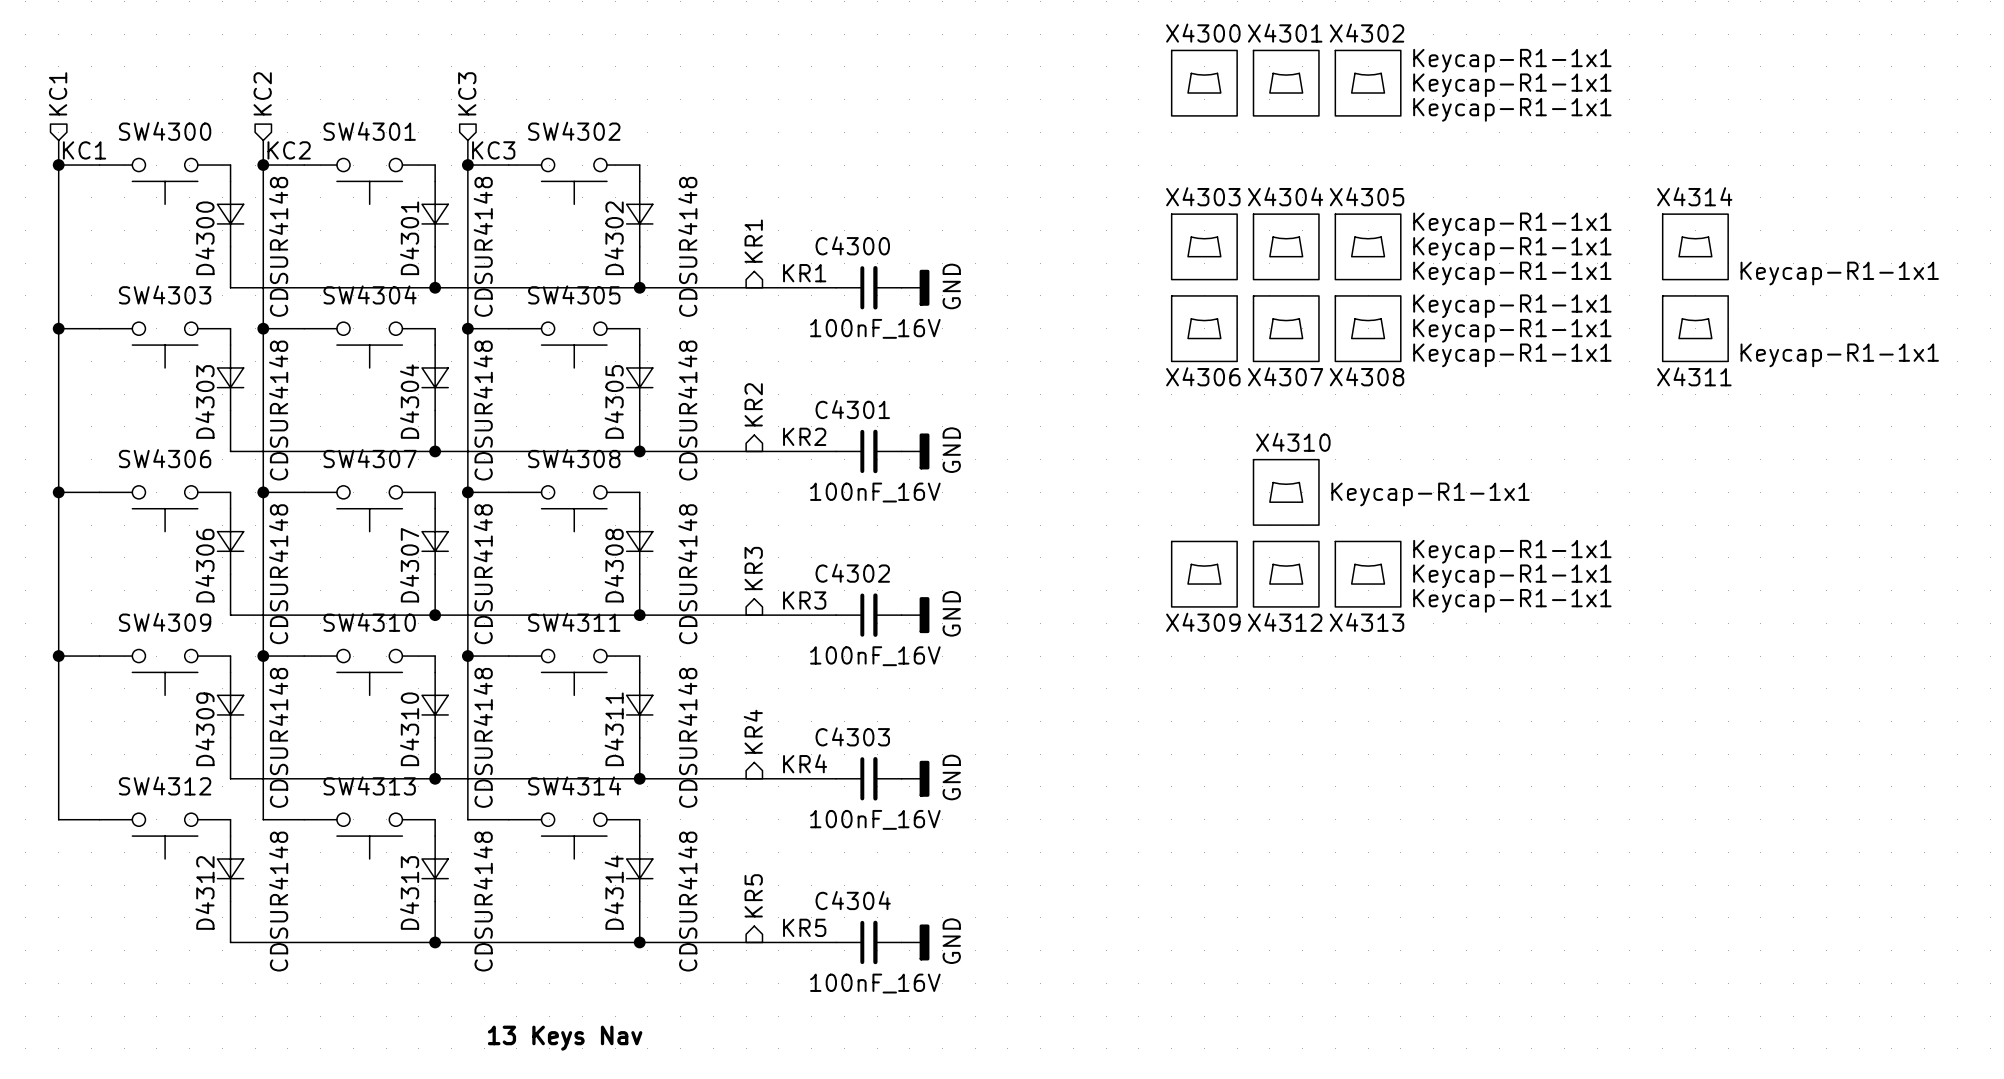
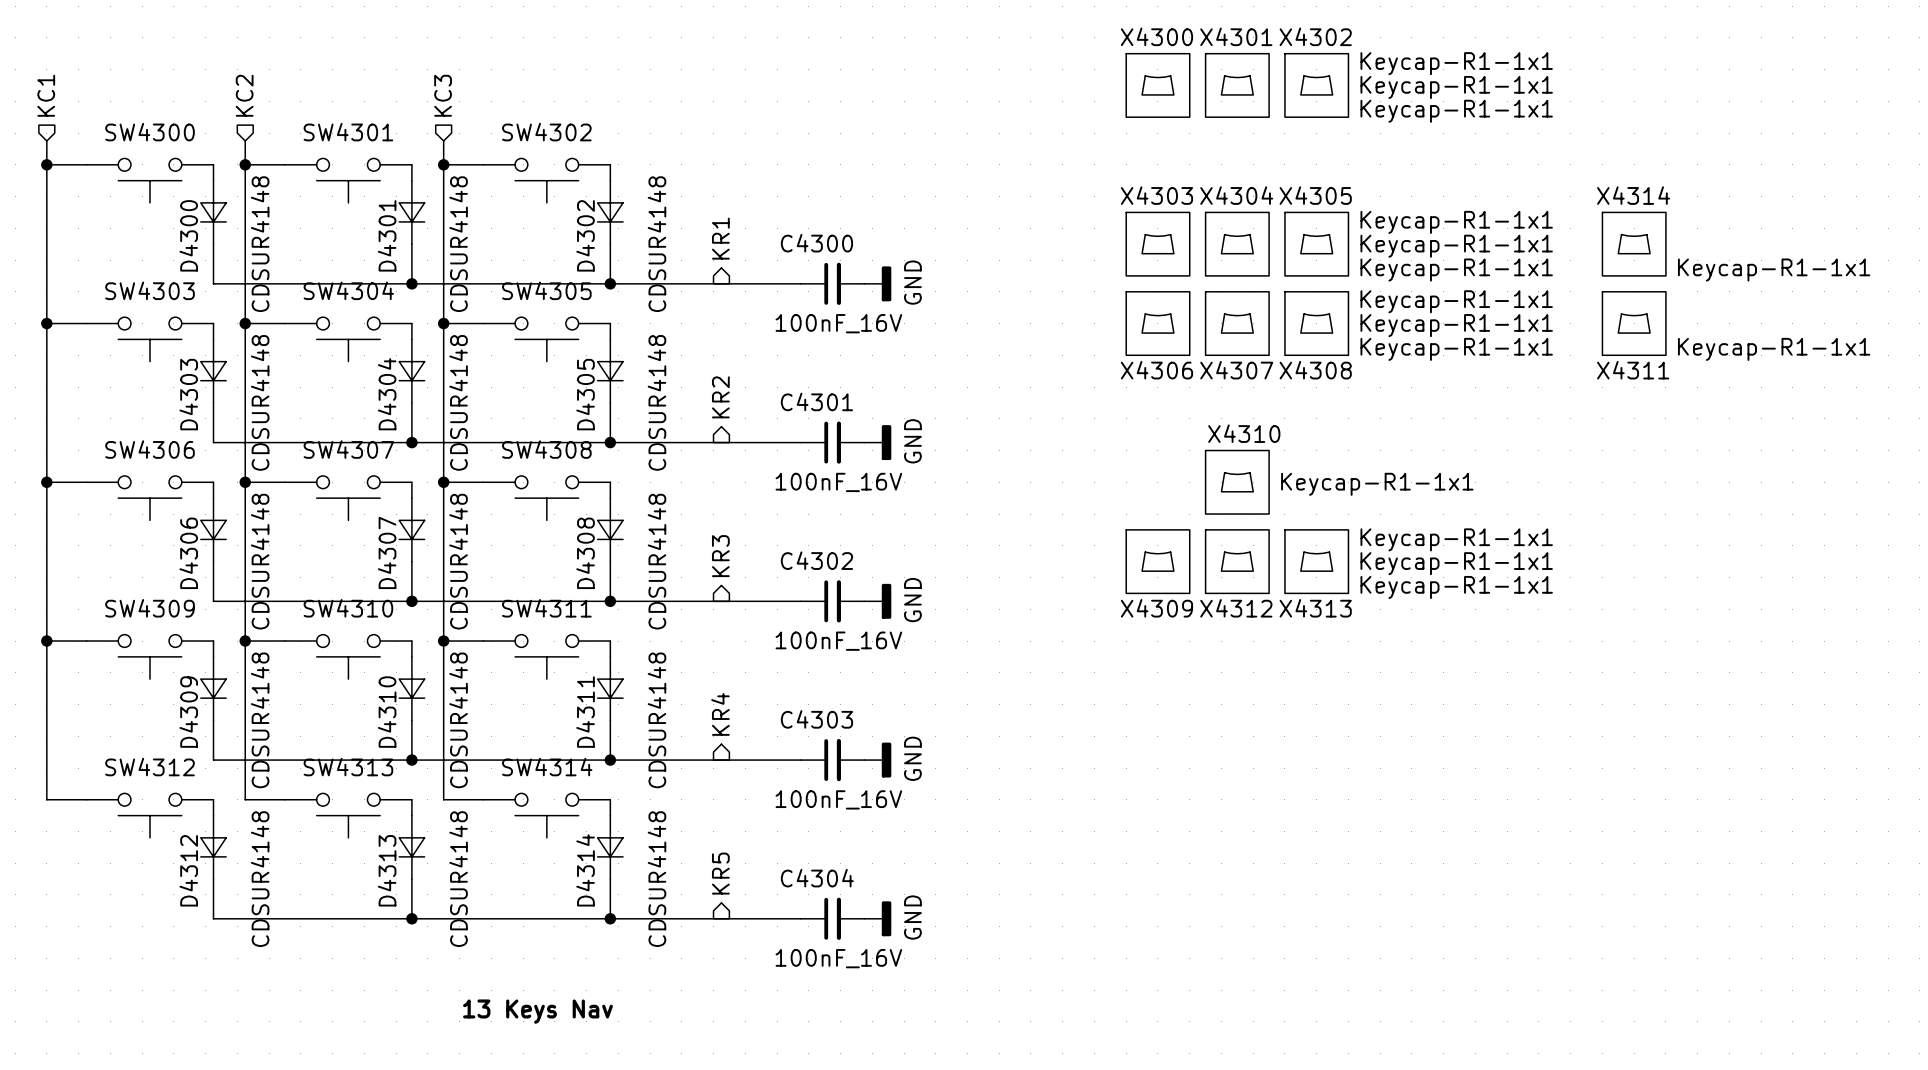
label: KC1 (84, 150) -> none
label: KC2 (289, 150) -> none
label: KC3 (493, 150) -> none
label: KR1 (804, 273) -> none
label: KR2 (804, 436) -> none
label: KR3 (804, 600) -> none
label: KR4 (805, 763) -> none
label: KR5 (804, 927) -> none

